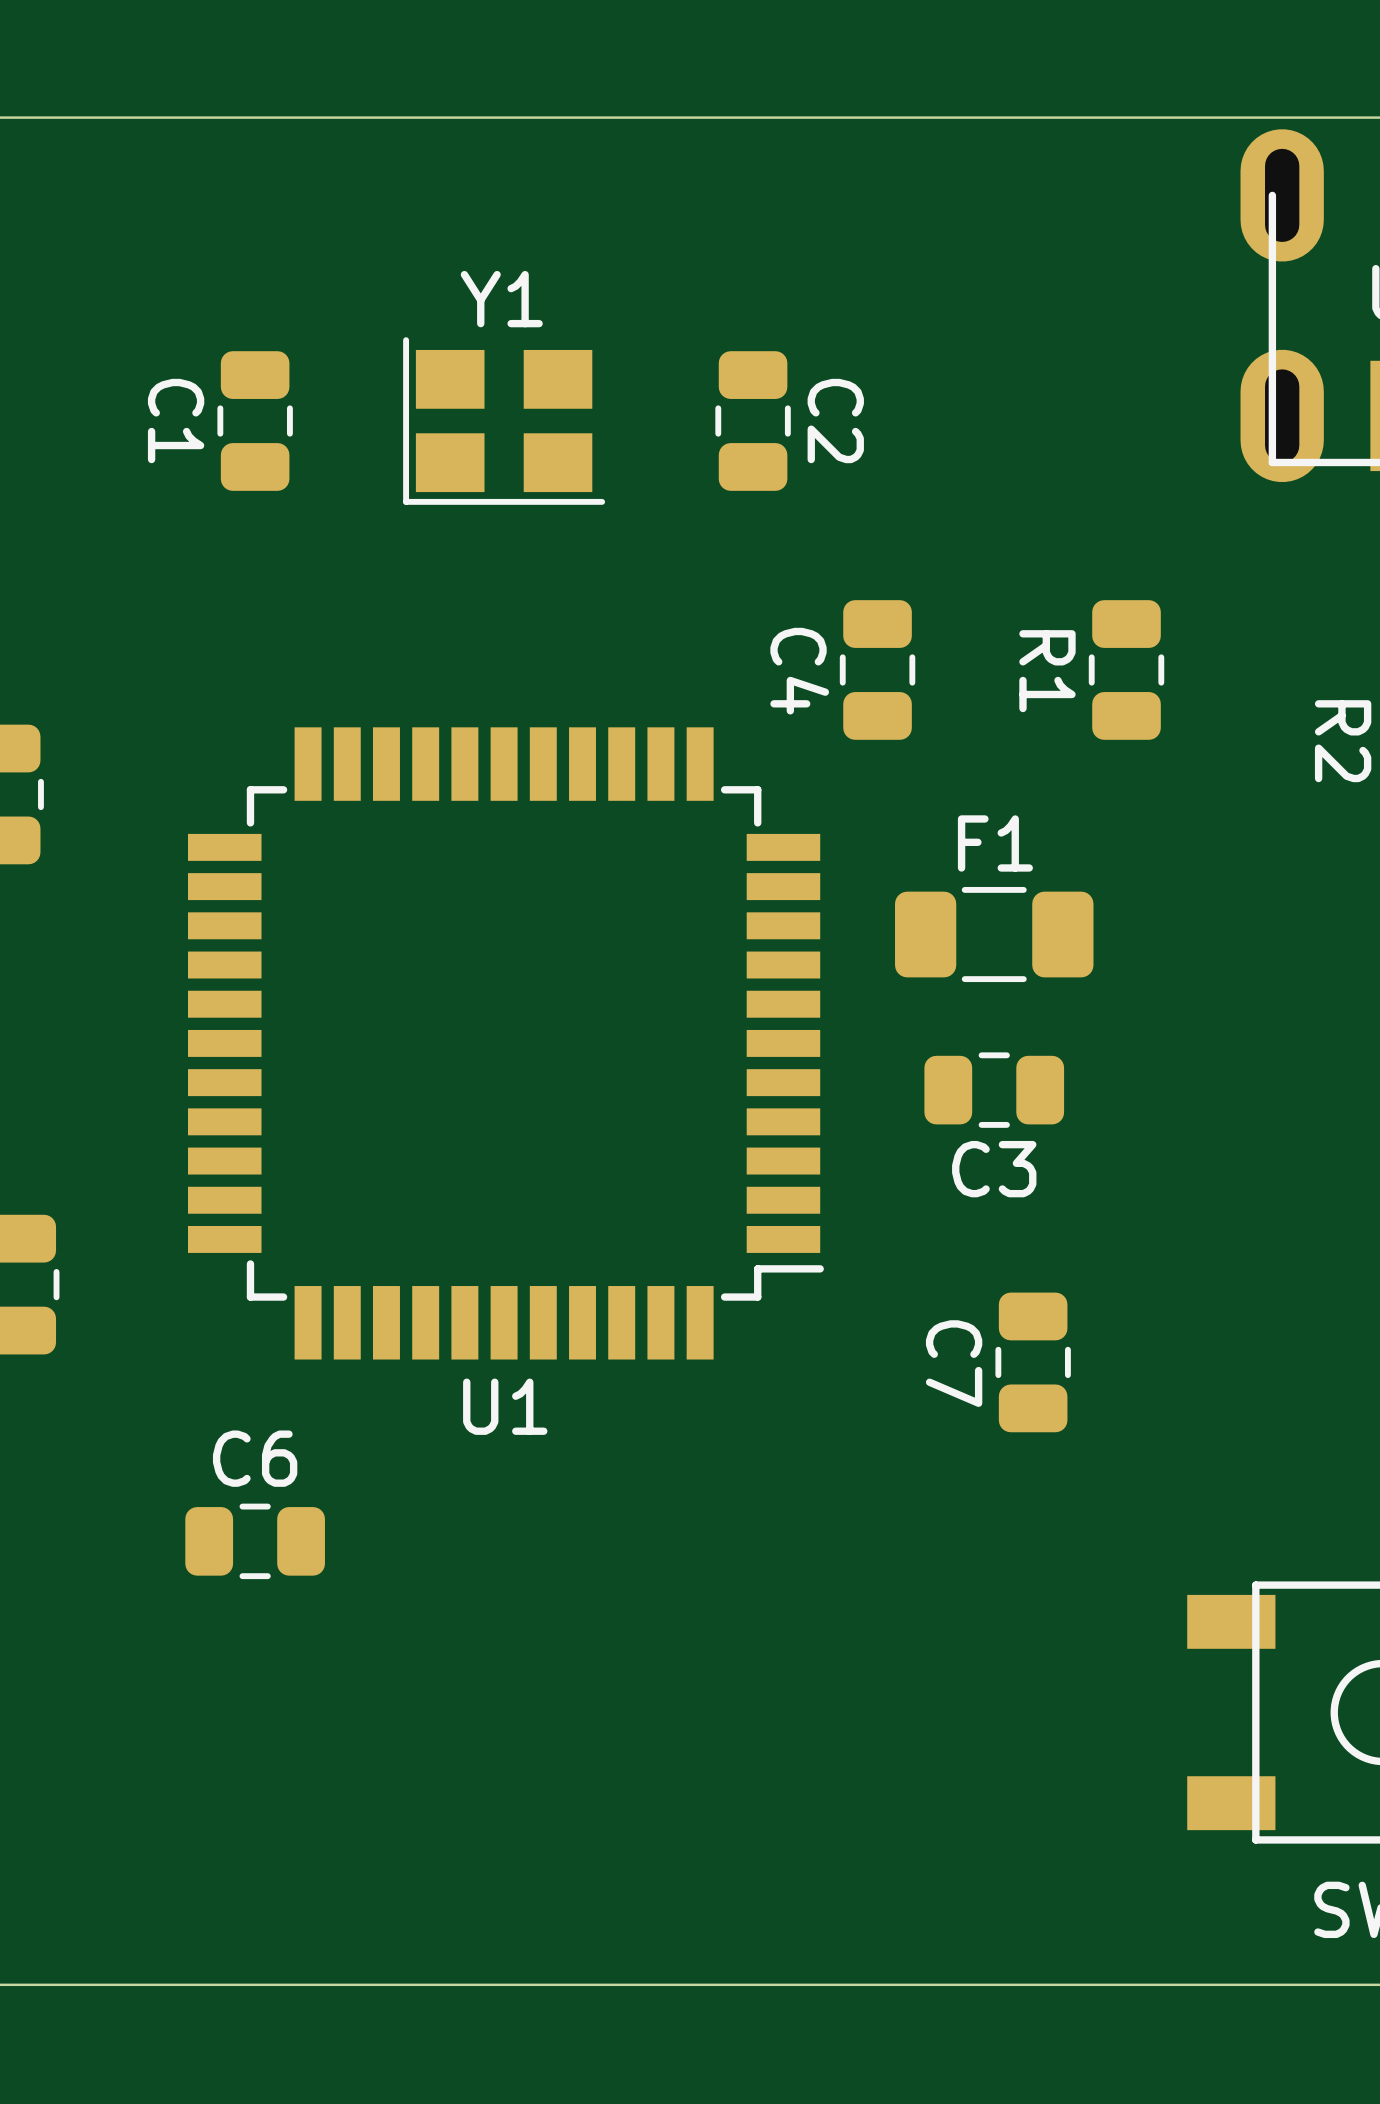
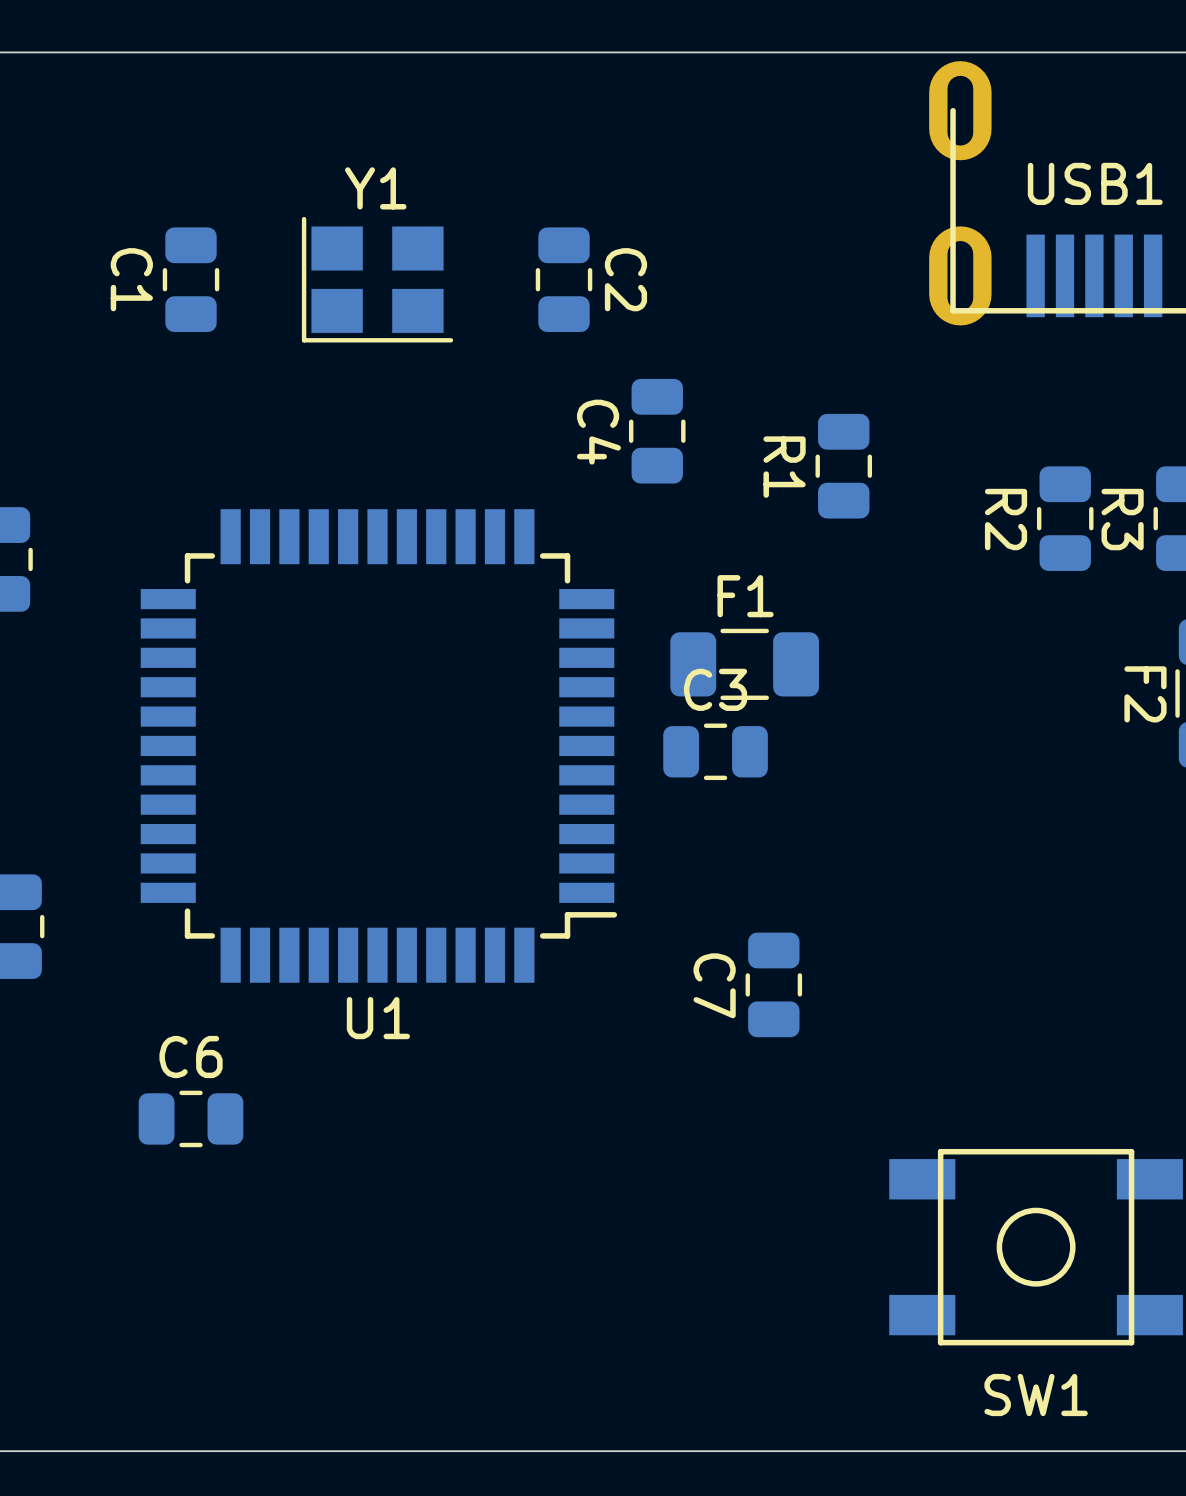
C4 position: (877, 669) -> (657, 431)
C3 position: (994, 1090) -> (715, 751)
C3 name position: C3 (994, 1169) -> C3 (715, 689)

